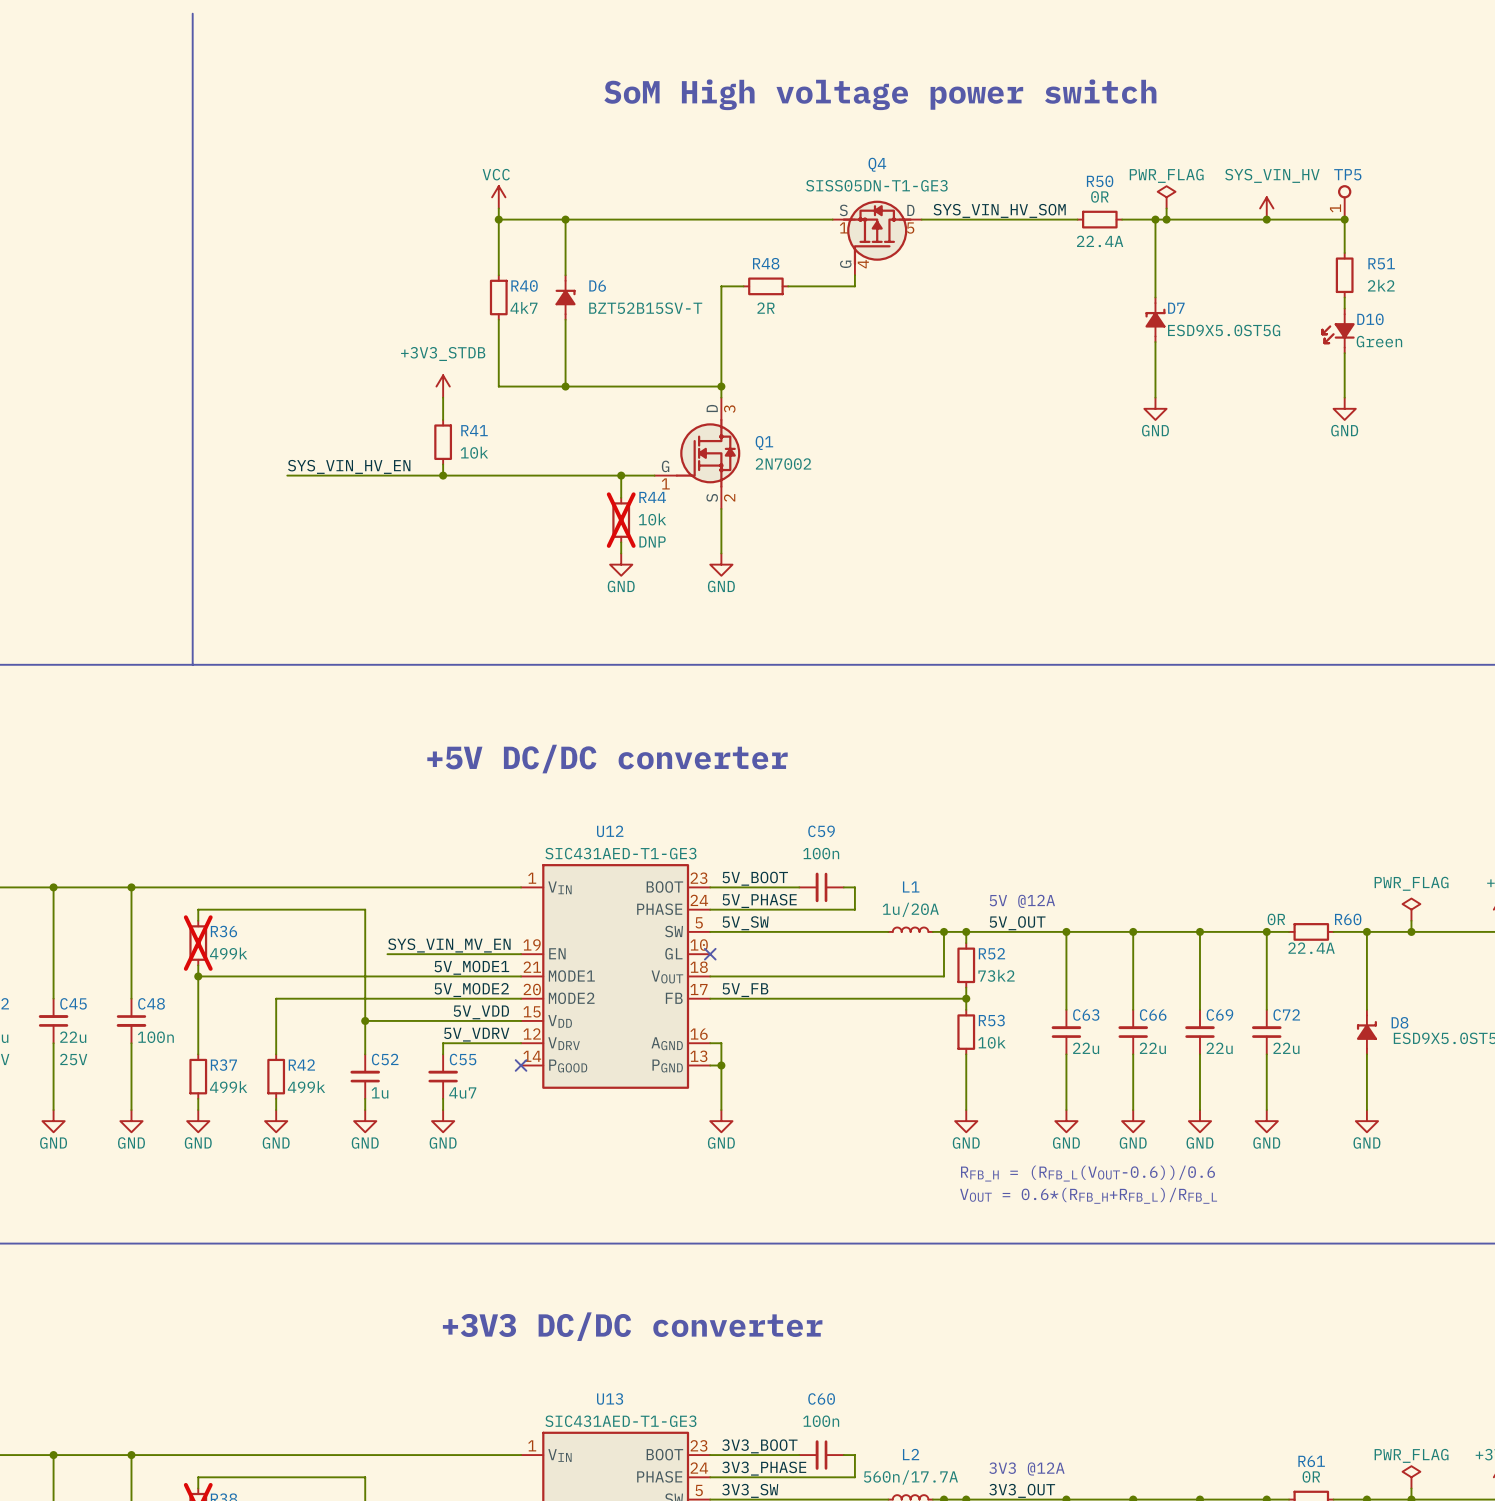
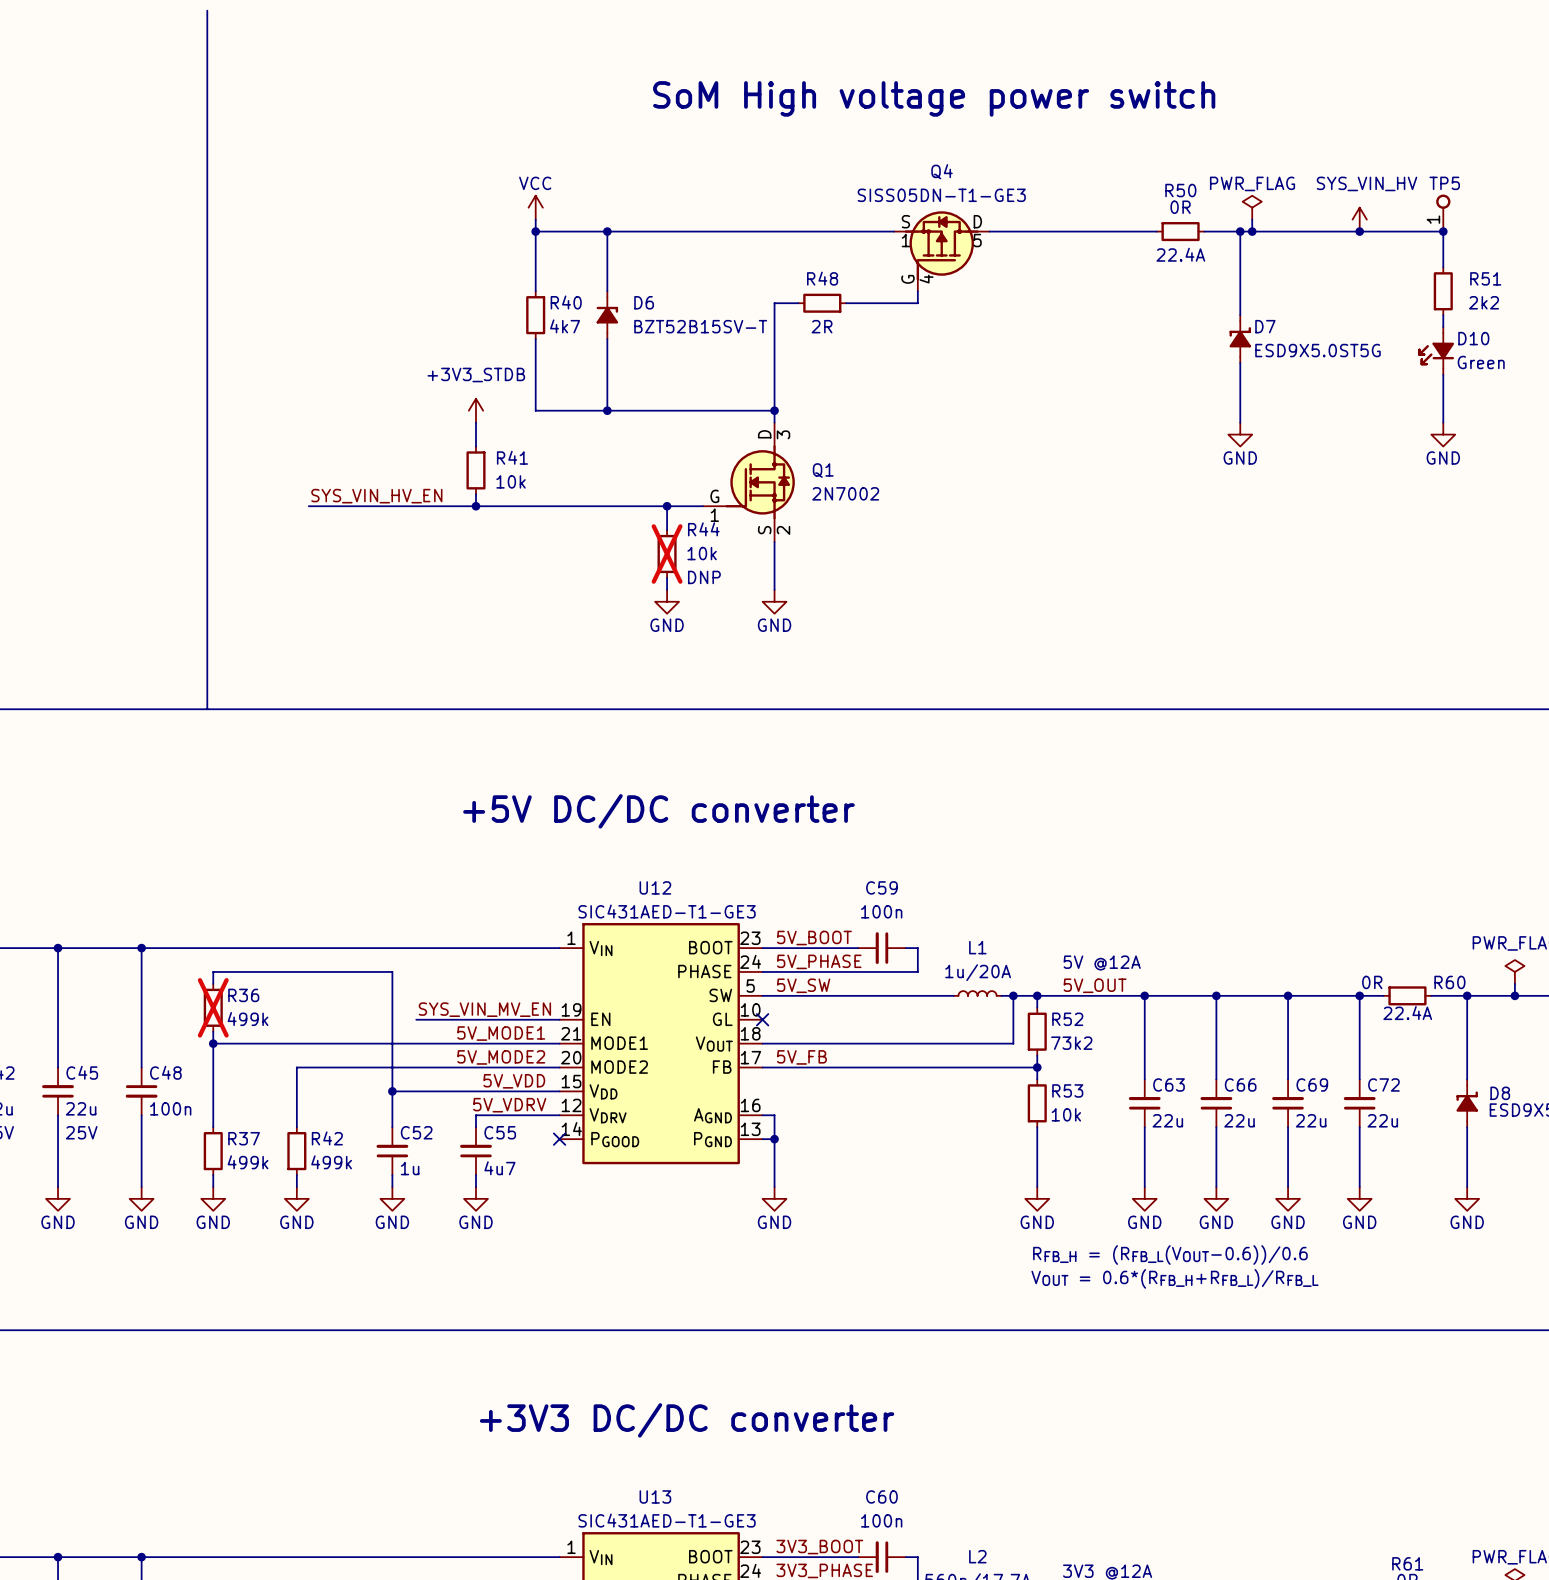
label: SYS_VIN_HV_SOM (999, 210) -> none

